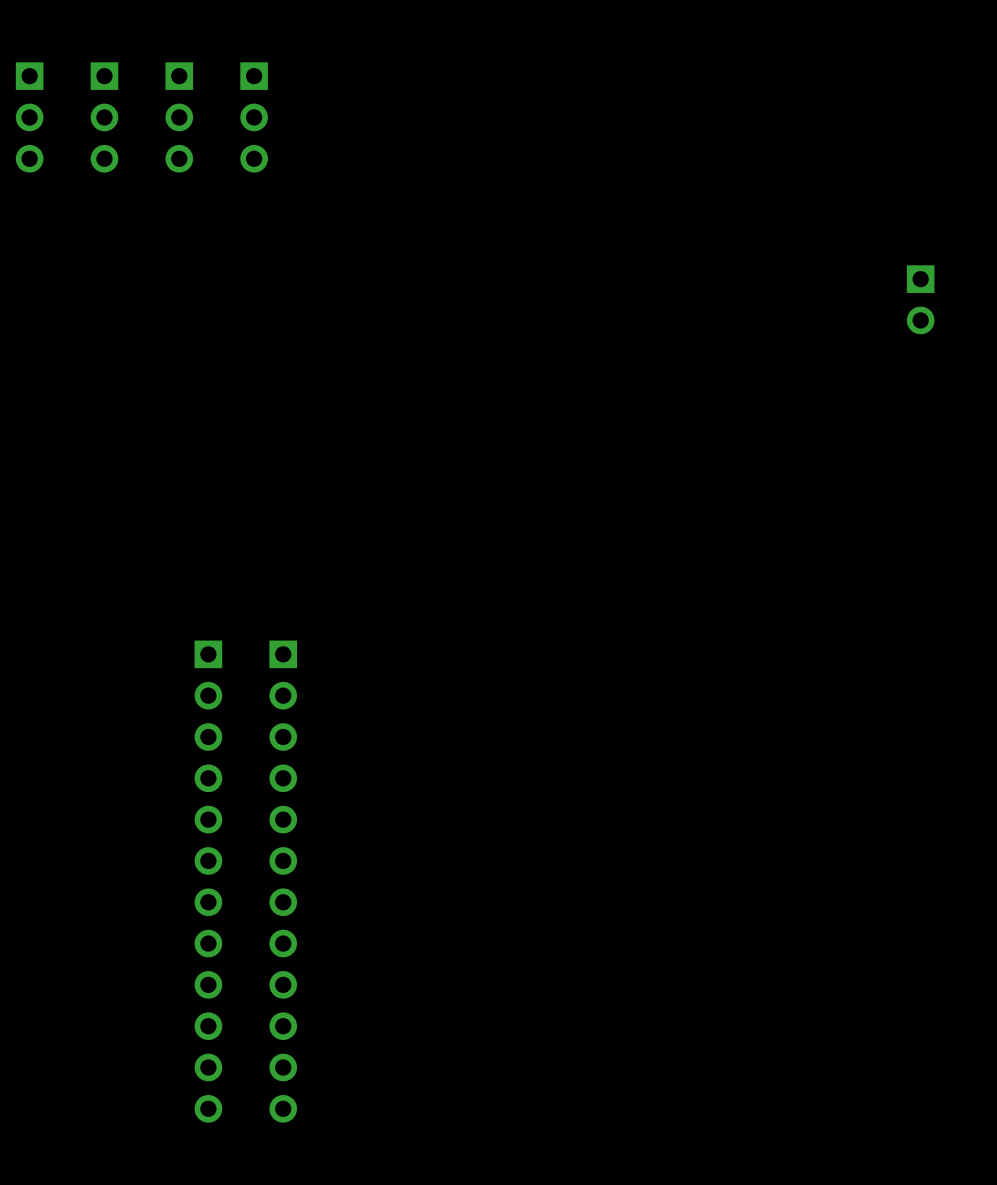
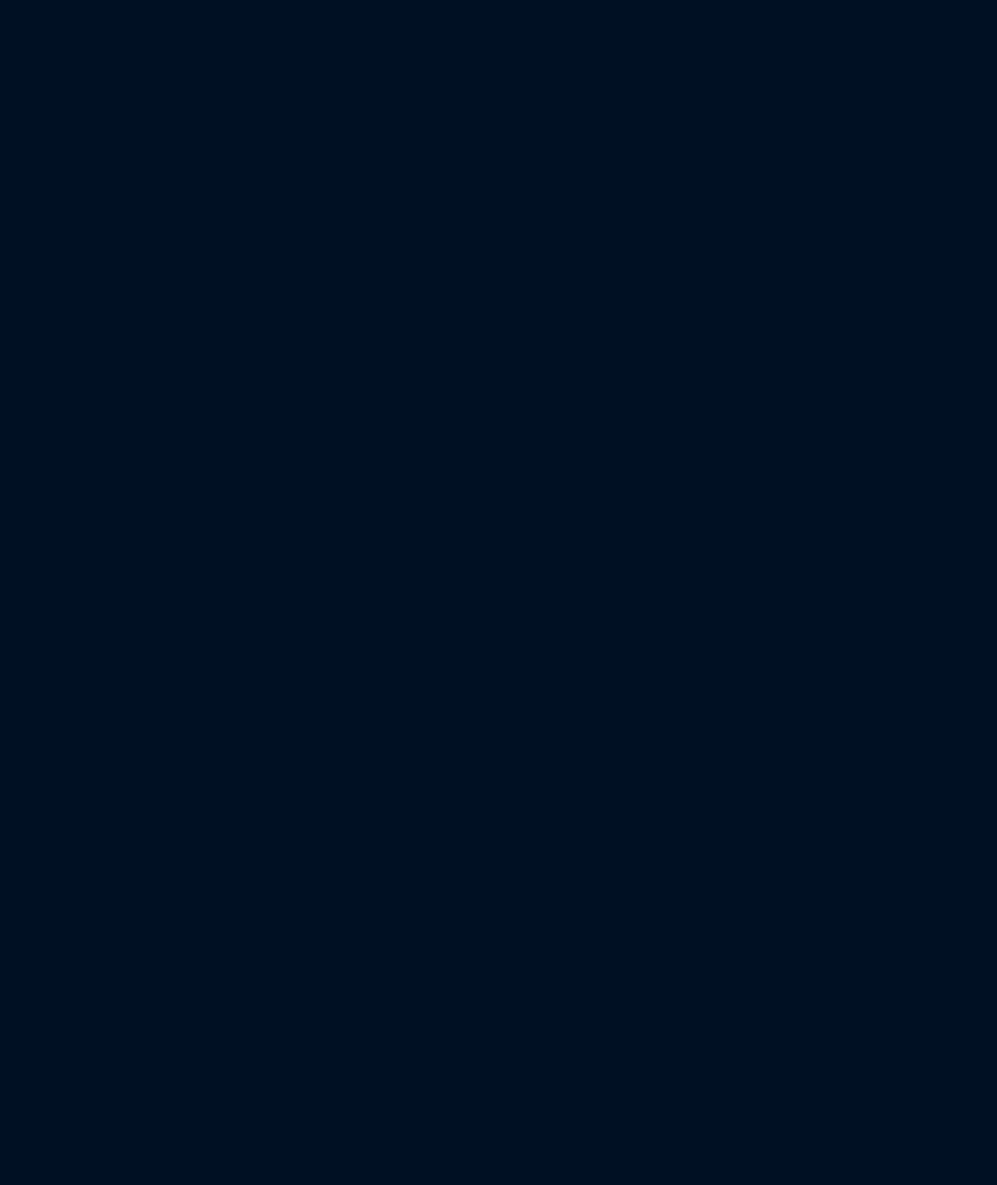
part: (29, 117) -> none
part: (104, 117) -> none
part: (179, 117) -> none
part: (254, 117) -> none
part: (920, 299) -> none
part: (208, 881) -> none
part: (283, 881) -> none

